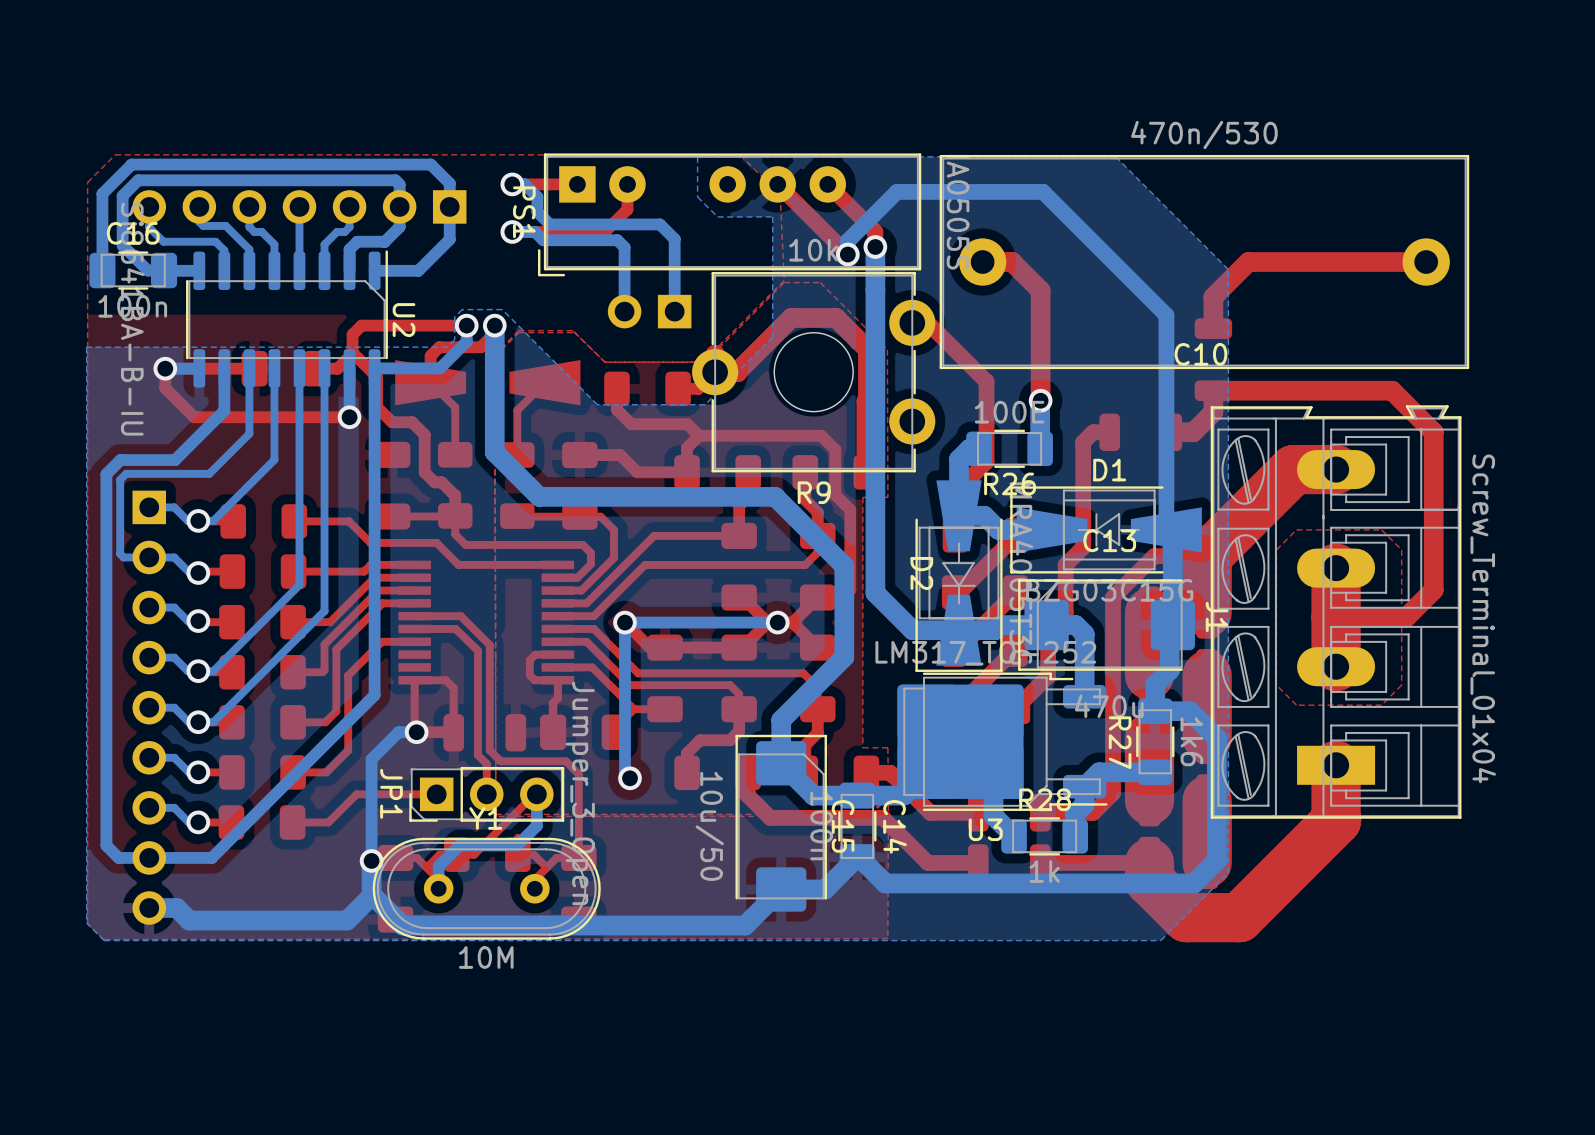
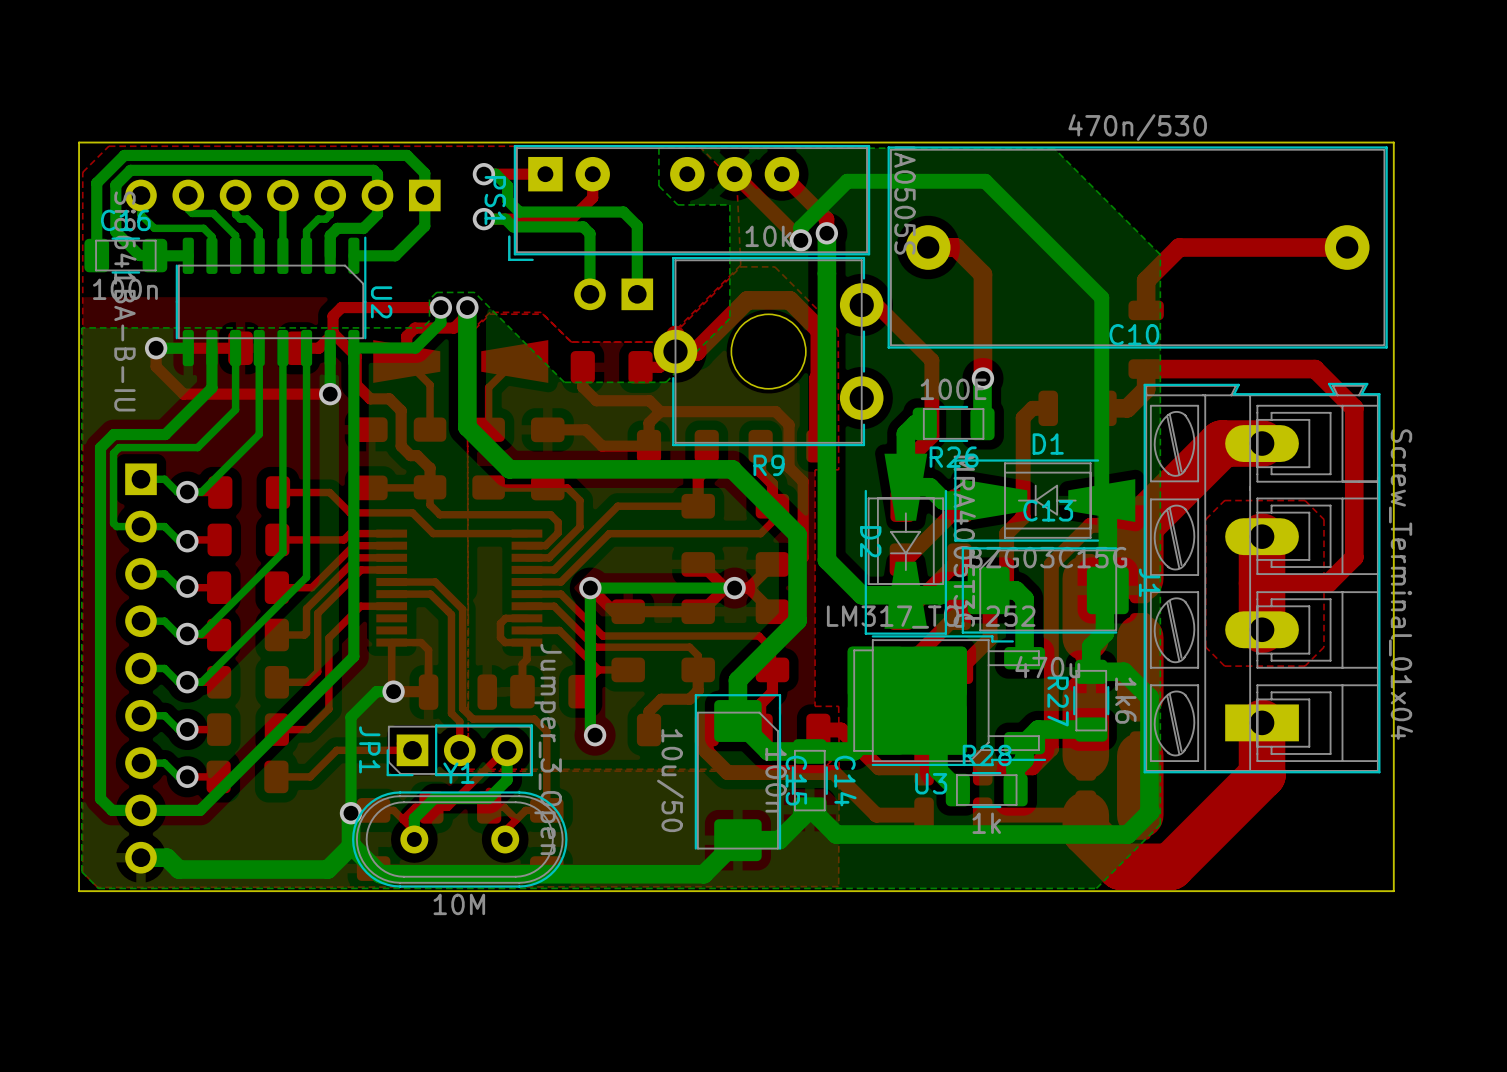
board edge: none -> (1393, 142) (79, 142) (79, 891) (1393, 891) (1393, 142)

